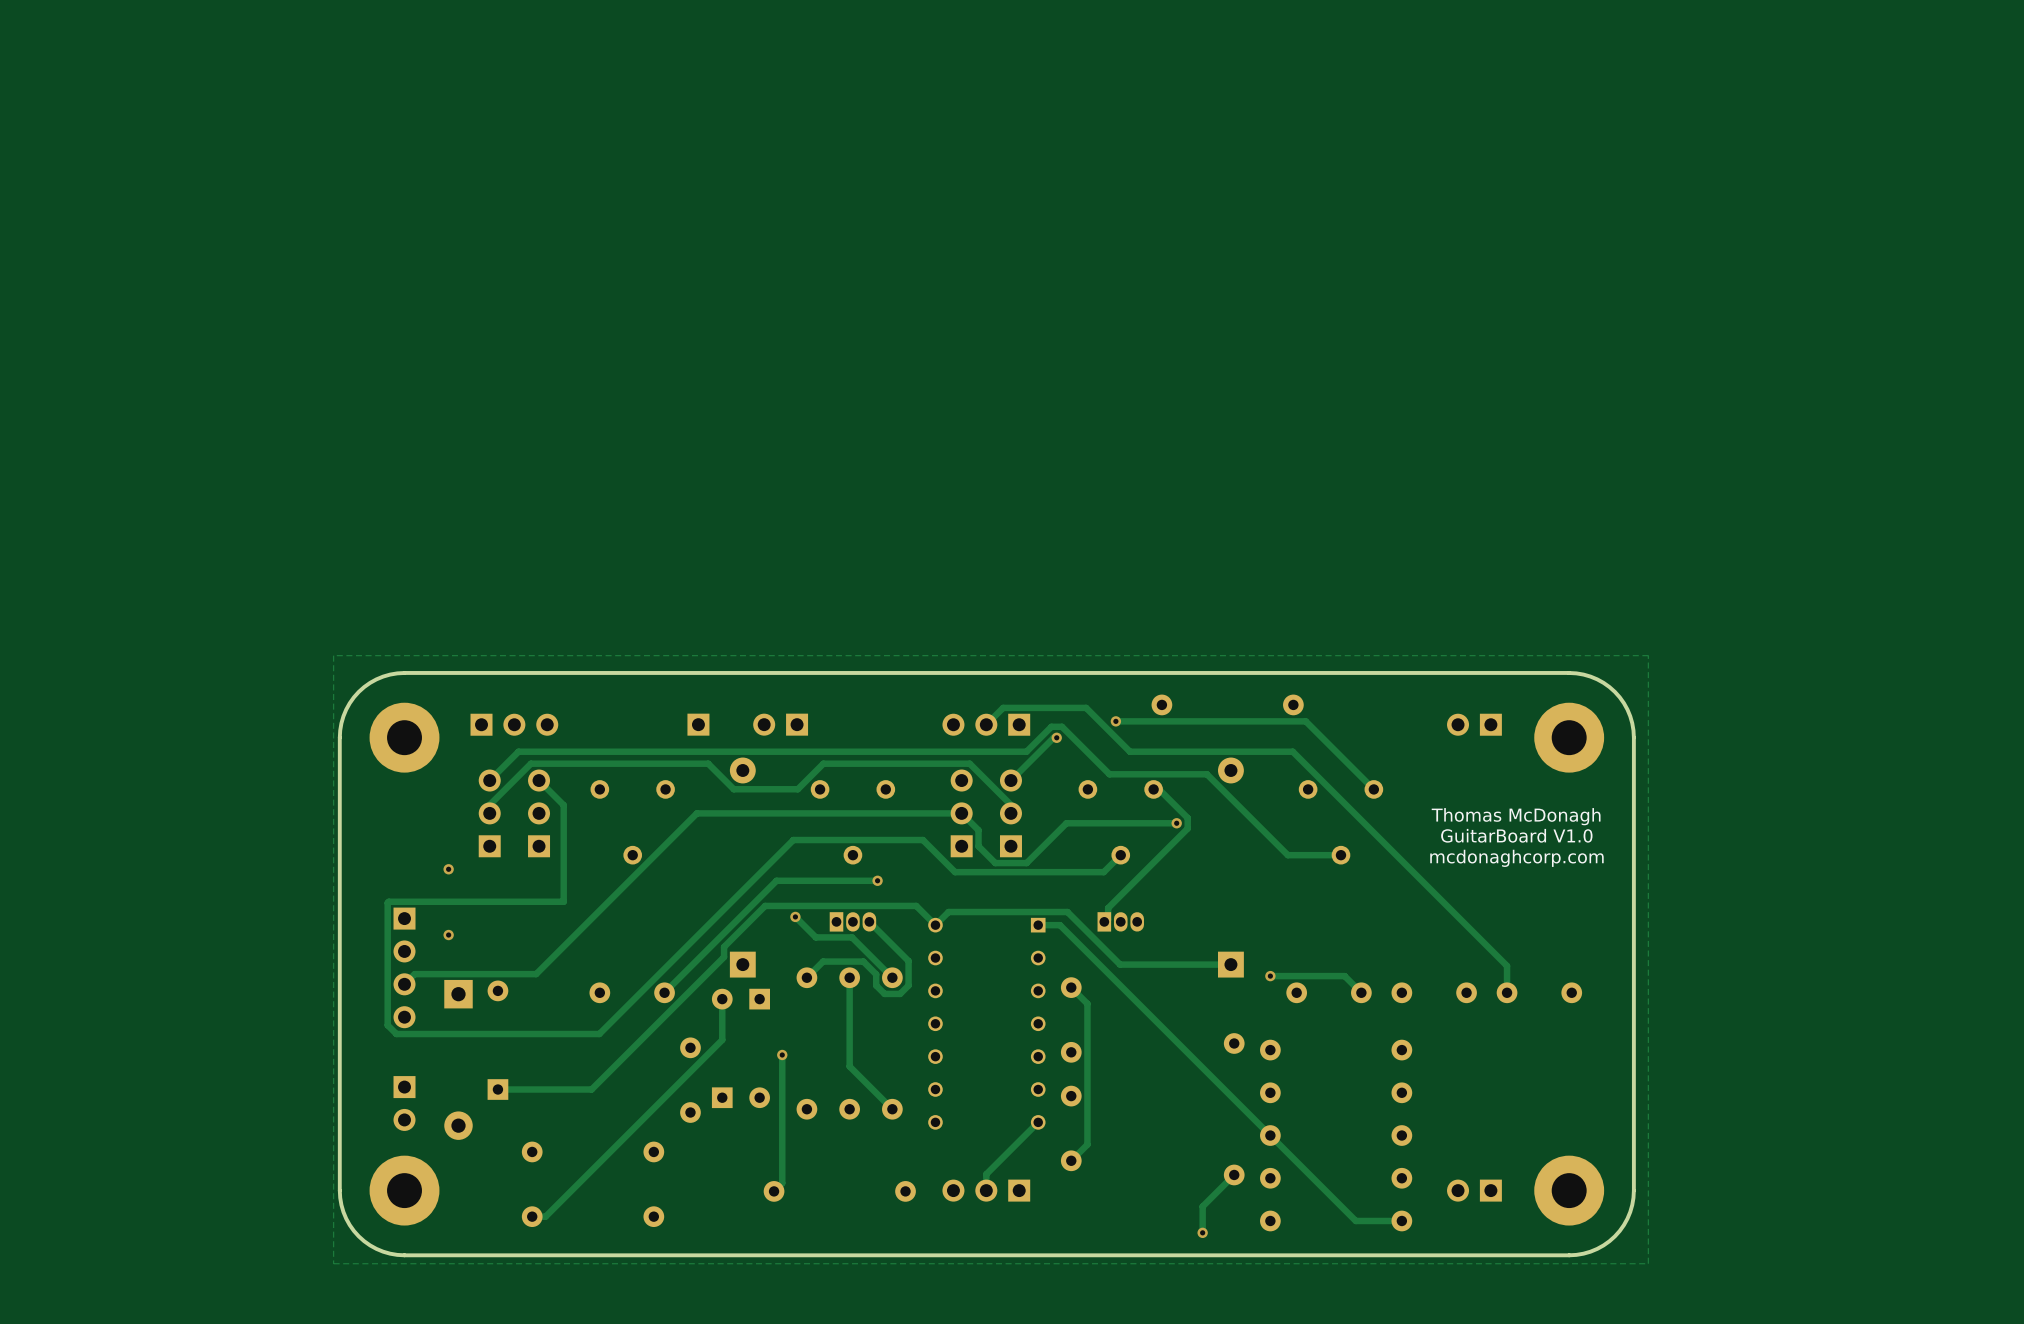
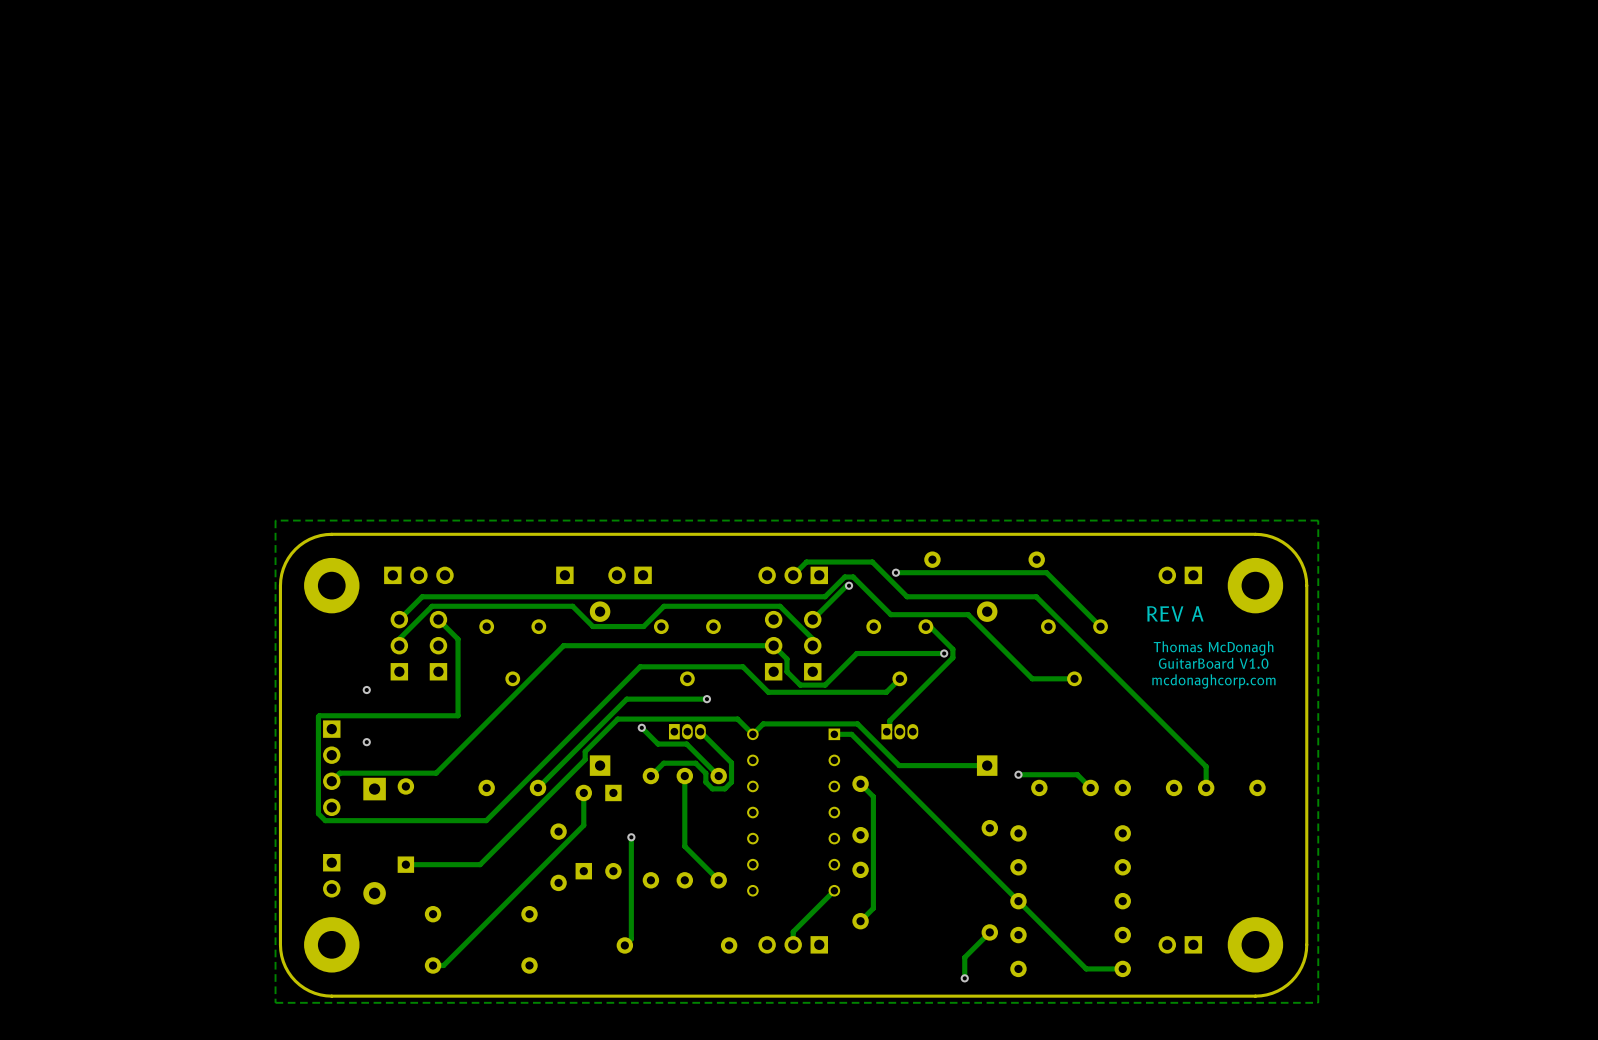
text: none -> REV A (1175, 613)

